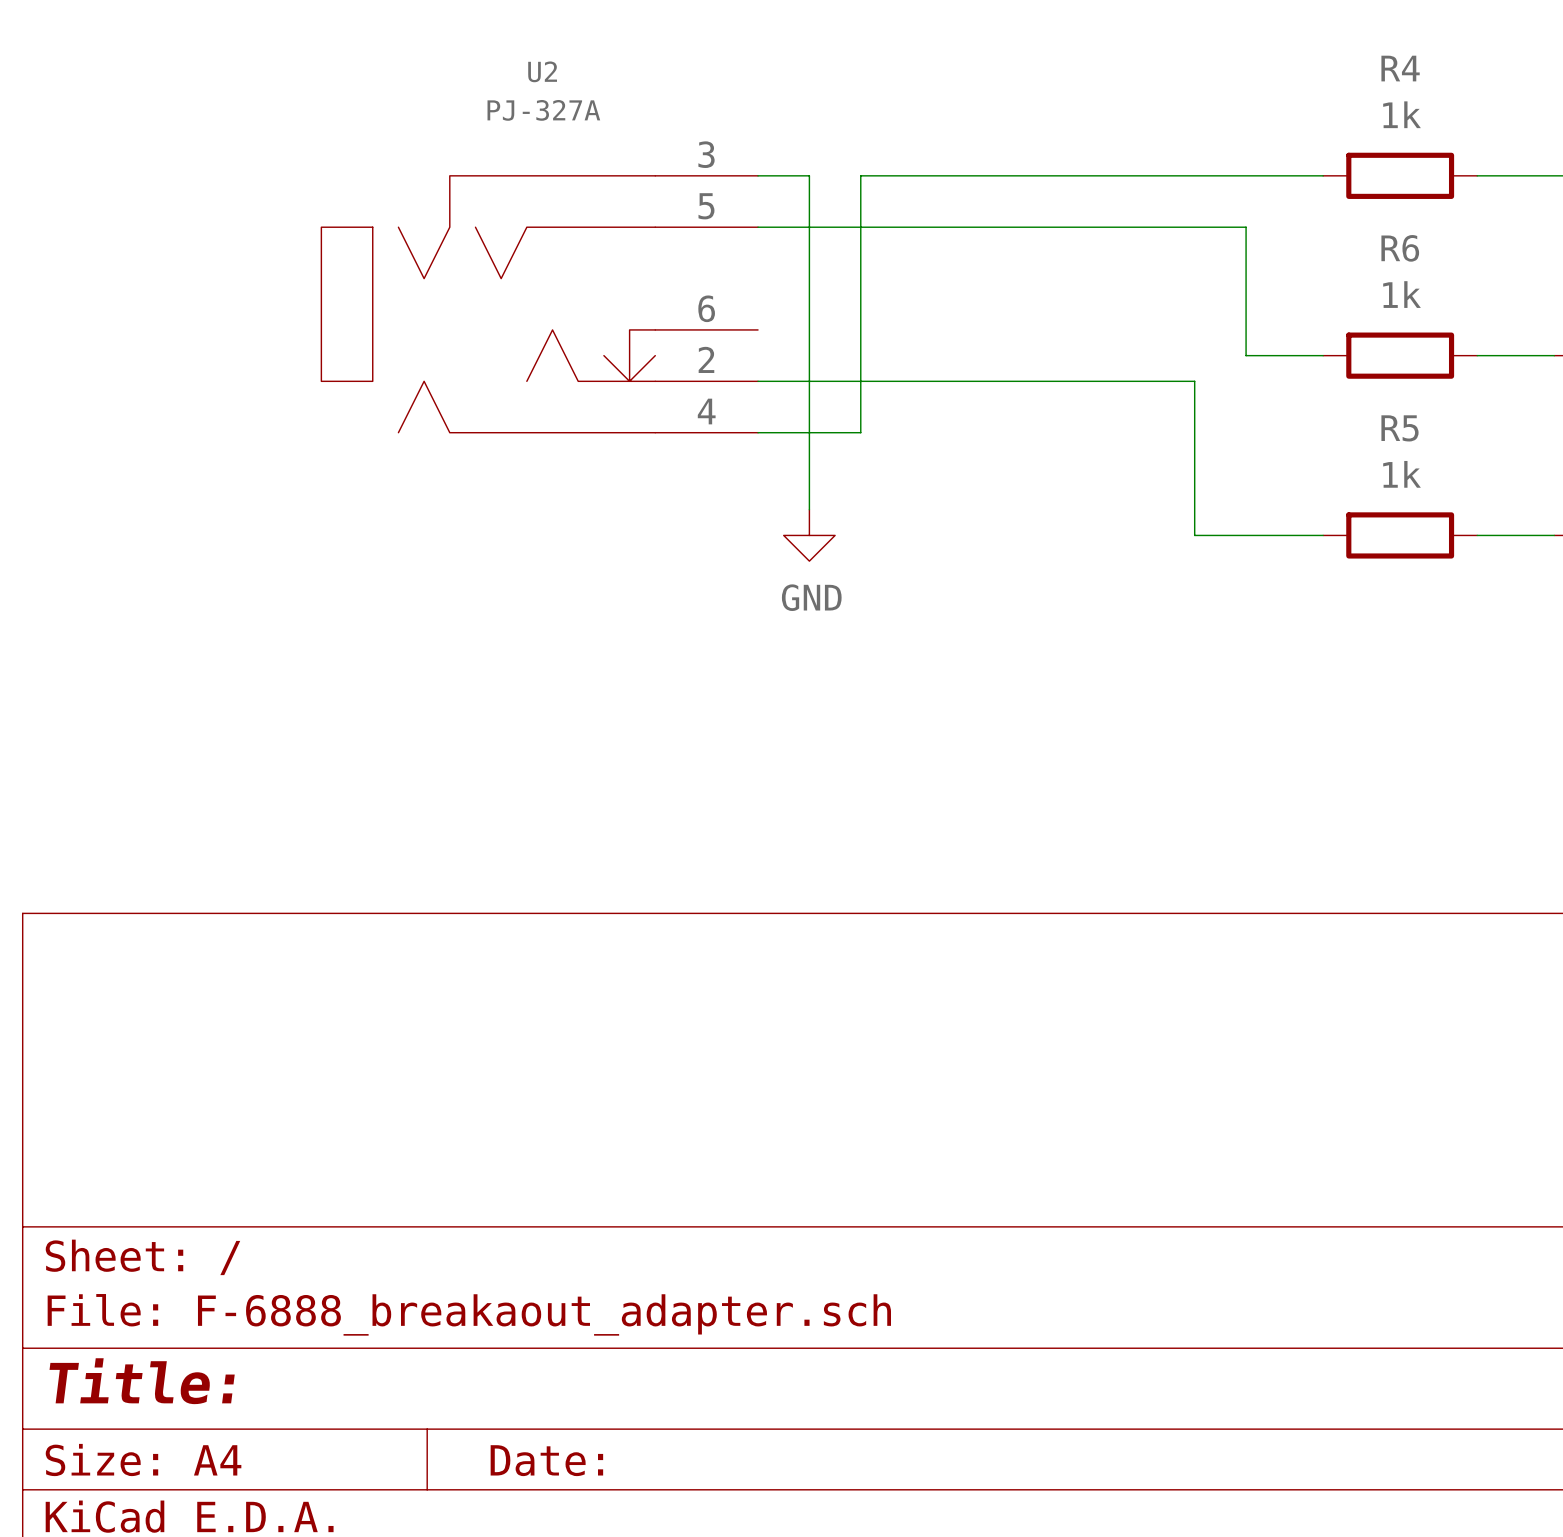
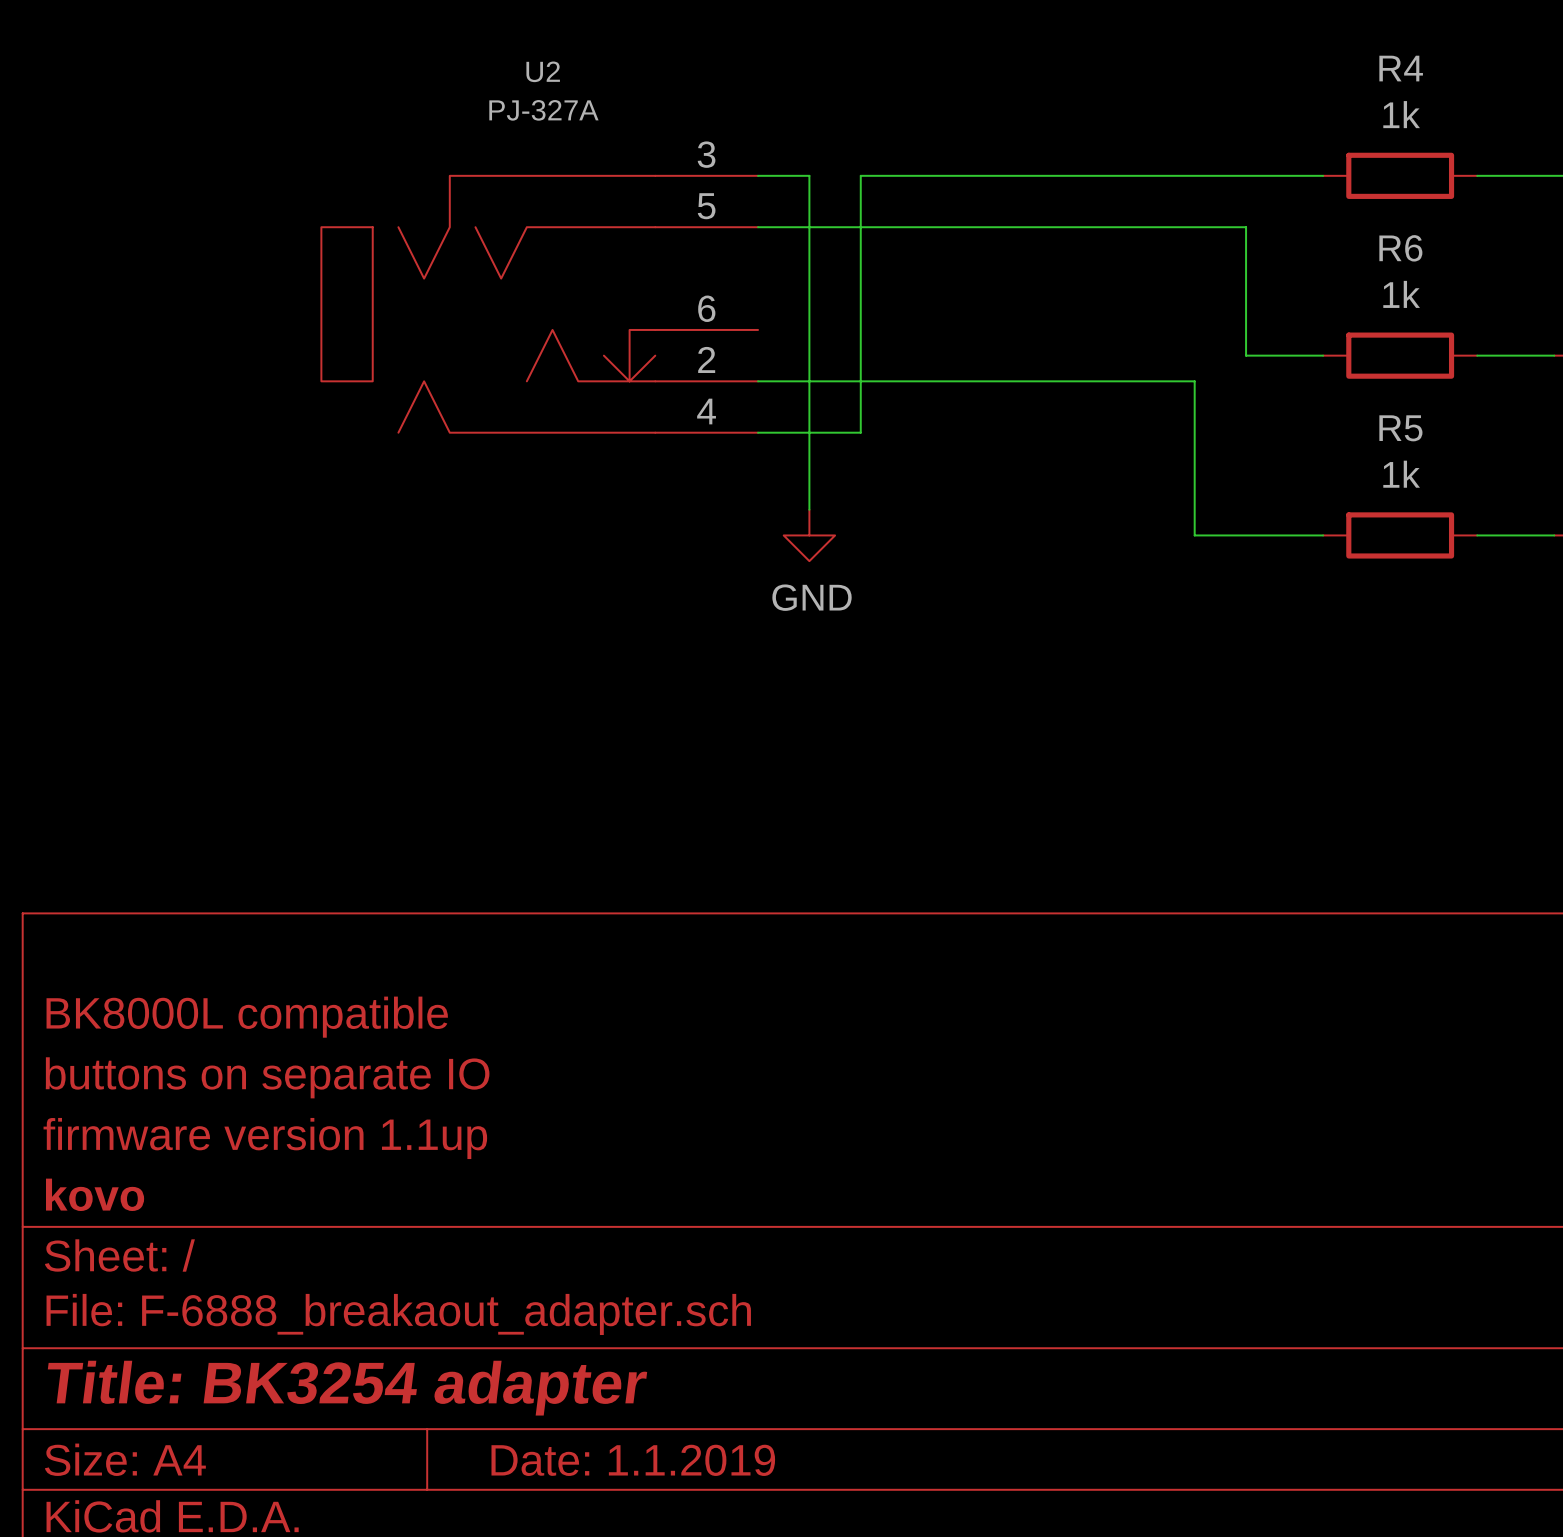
title block: none -> BK8000L compatible (247, 1017)
title block: none -> buttons on separate IO (267, 1077)
title block: none -> firmware version 1.1up (265, 1138)
title block: none -> kovo (95, 1194)
title block: Title: (142, 1381) -> Title: BK3254 adapter (347, 1388)
title block: Date: (546, 1460) -> Date: 1.1.2019 (633, 1460)

